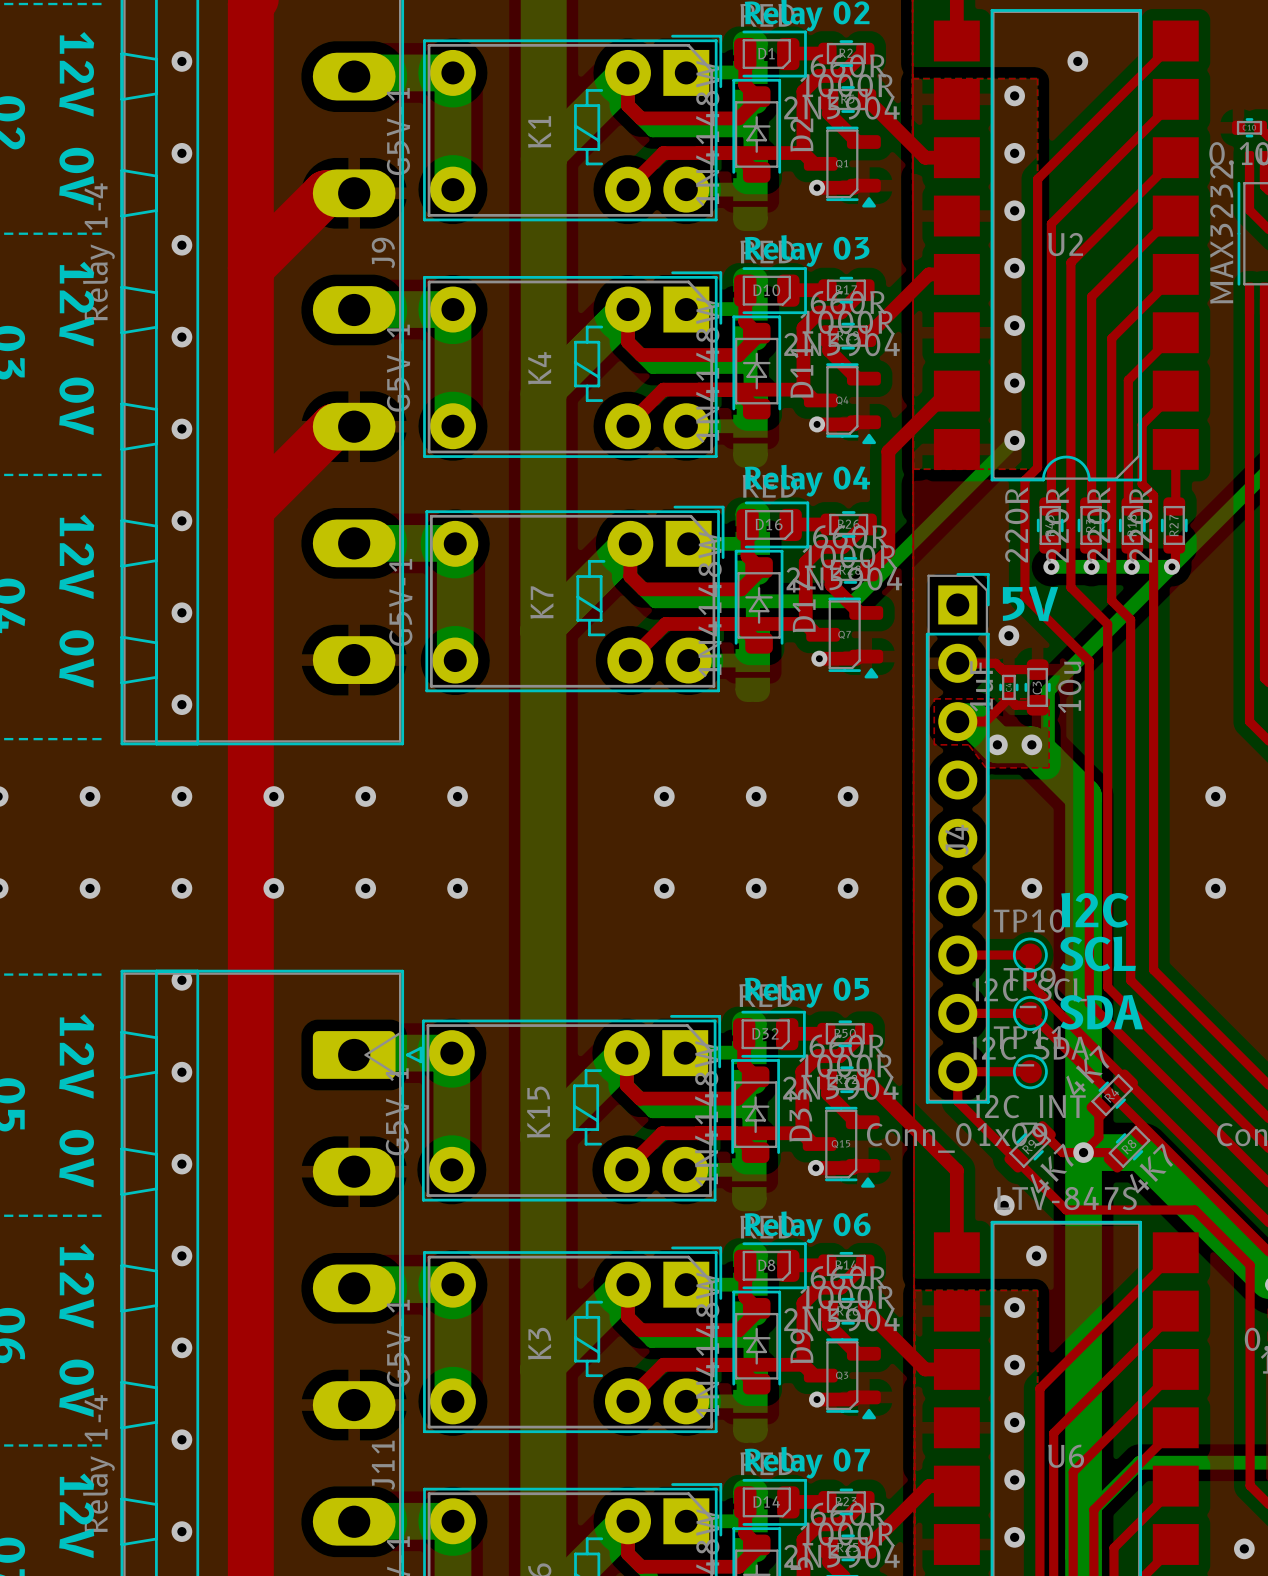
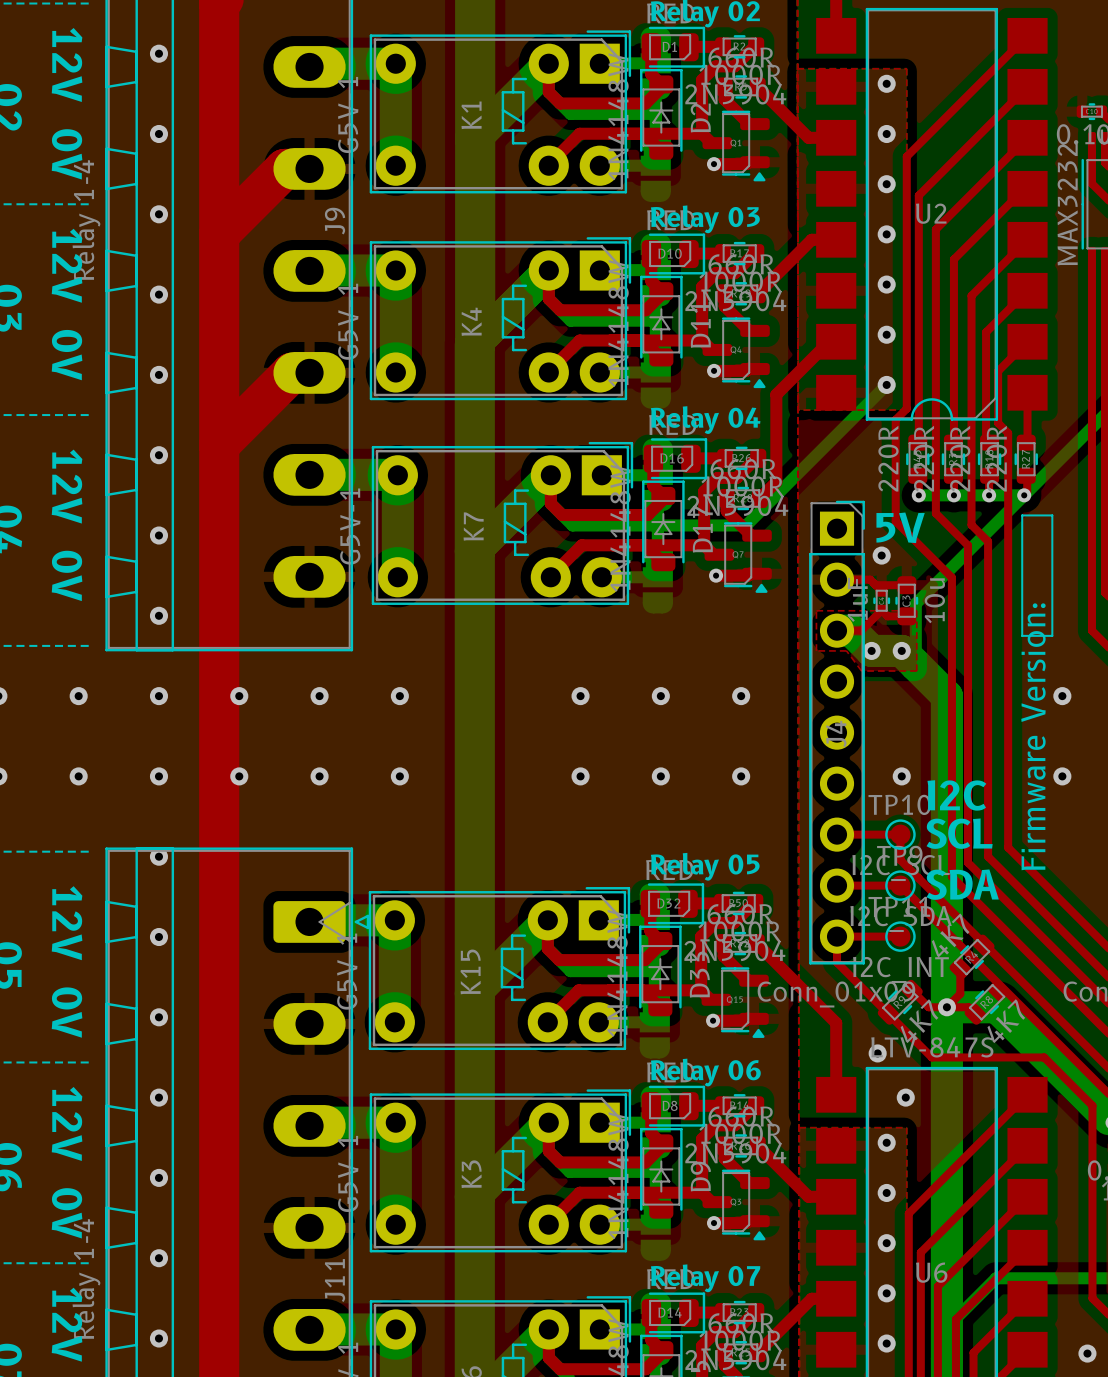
via: (1077, 61) -> none
line: none -> (1022, 515) (1052, 515) (1052, 635) (1022, 635) (1022, 515)
text: none -> Firmware Version: (1033, 736)

